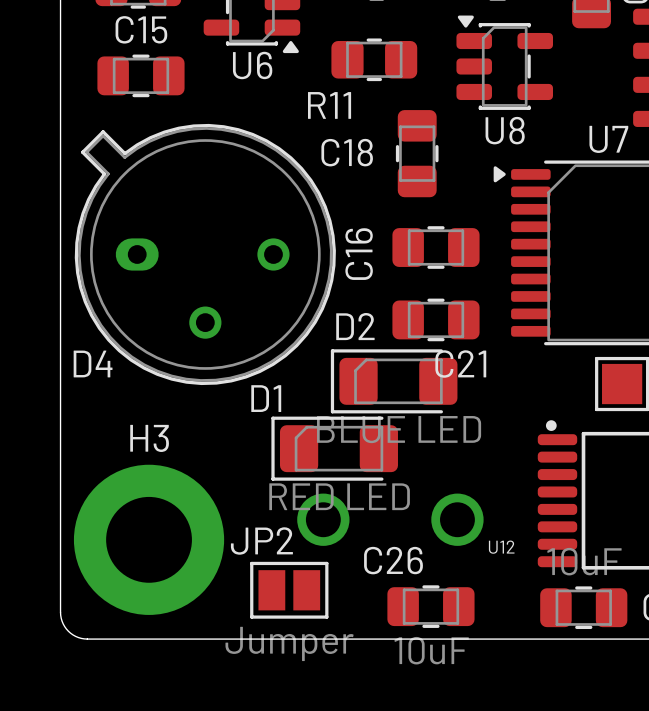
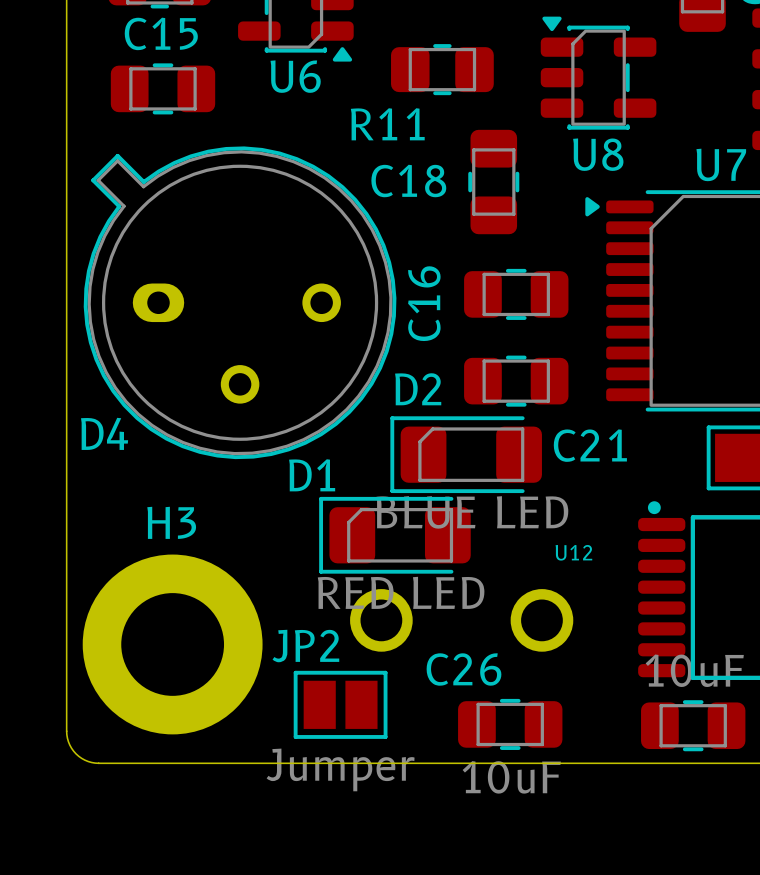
C21 name position: C21 (460, 364) -> C21 (590, 445)
U12 name position: U12 (501, 547) -> U12 (573, 552)

